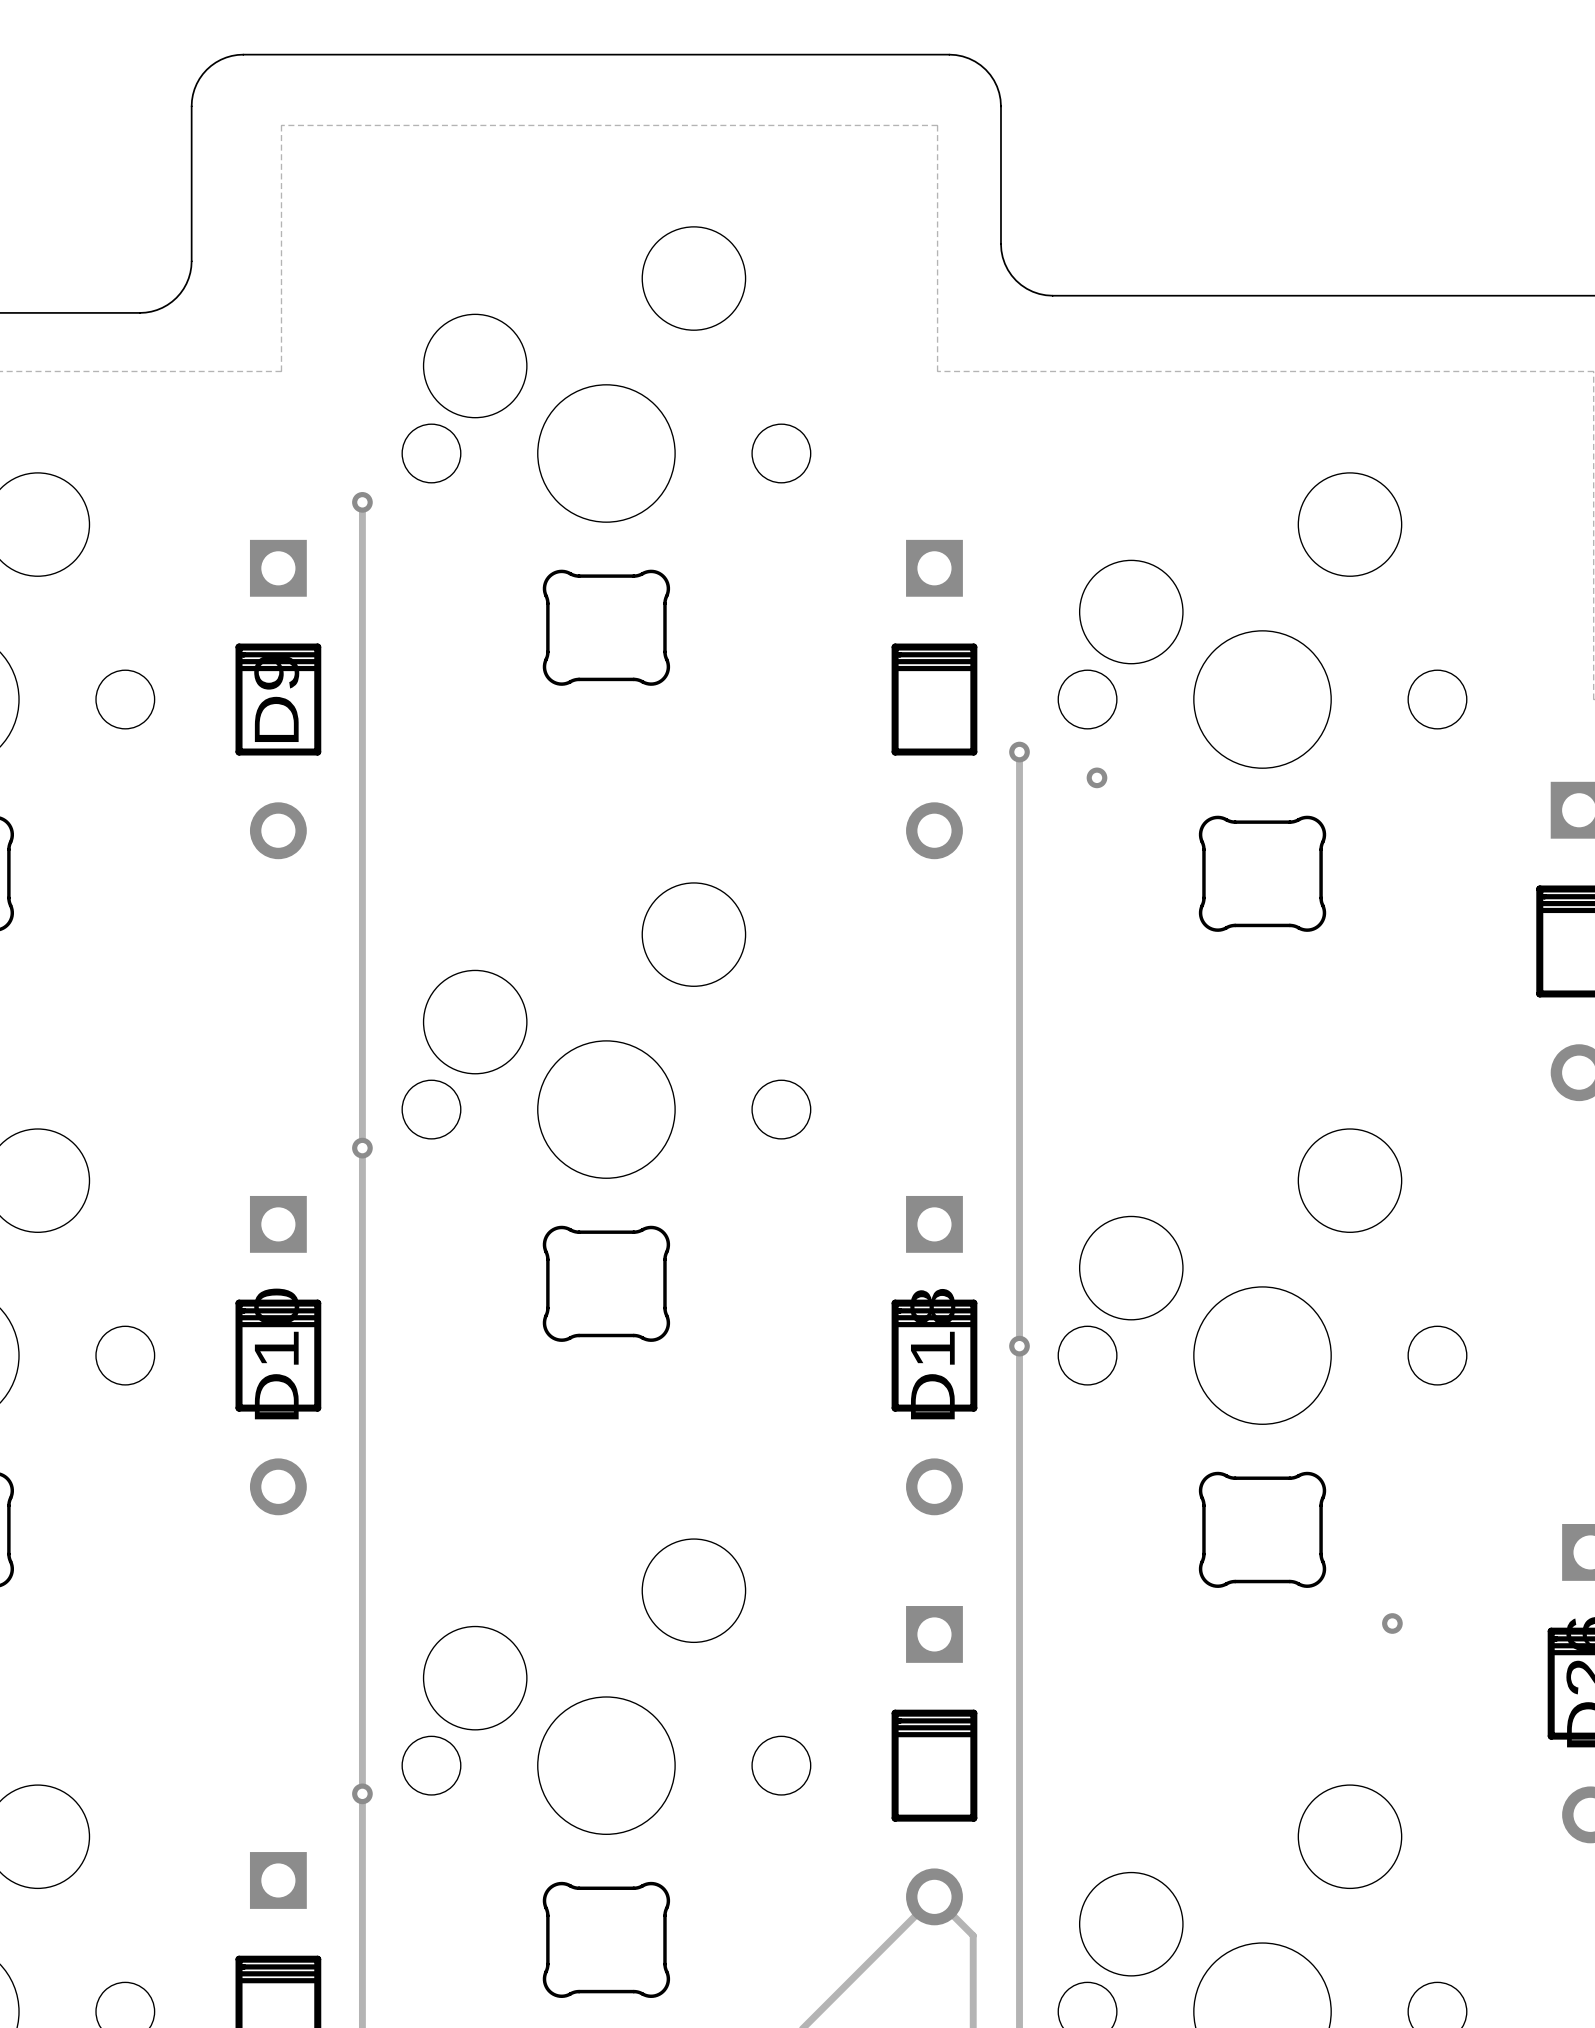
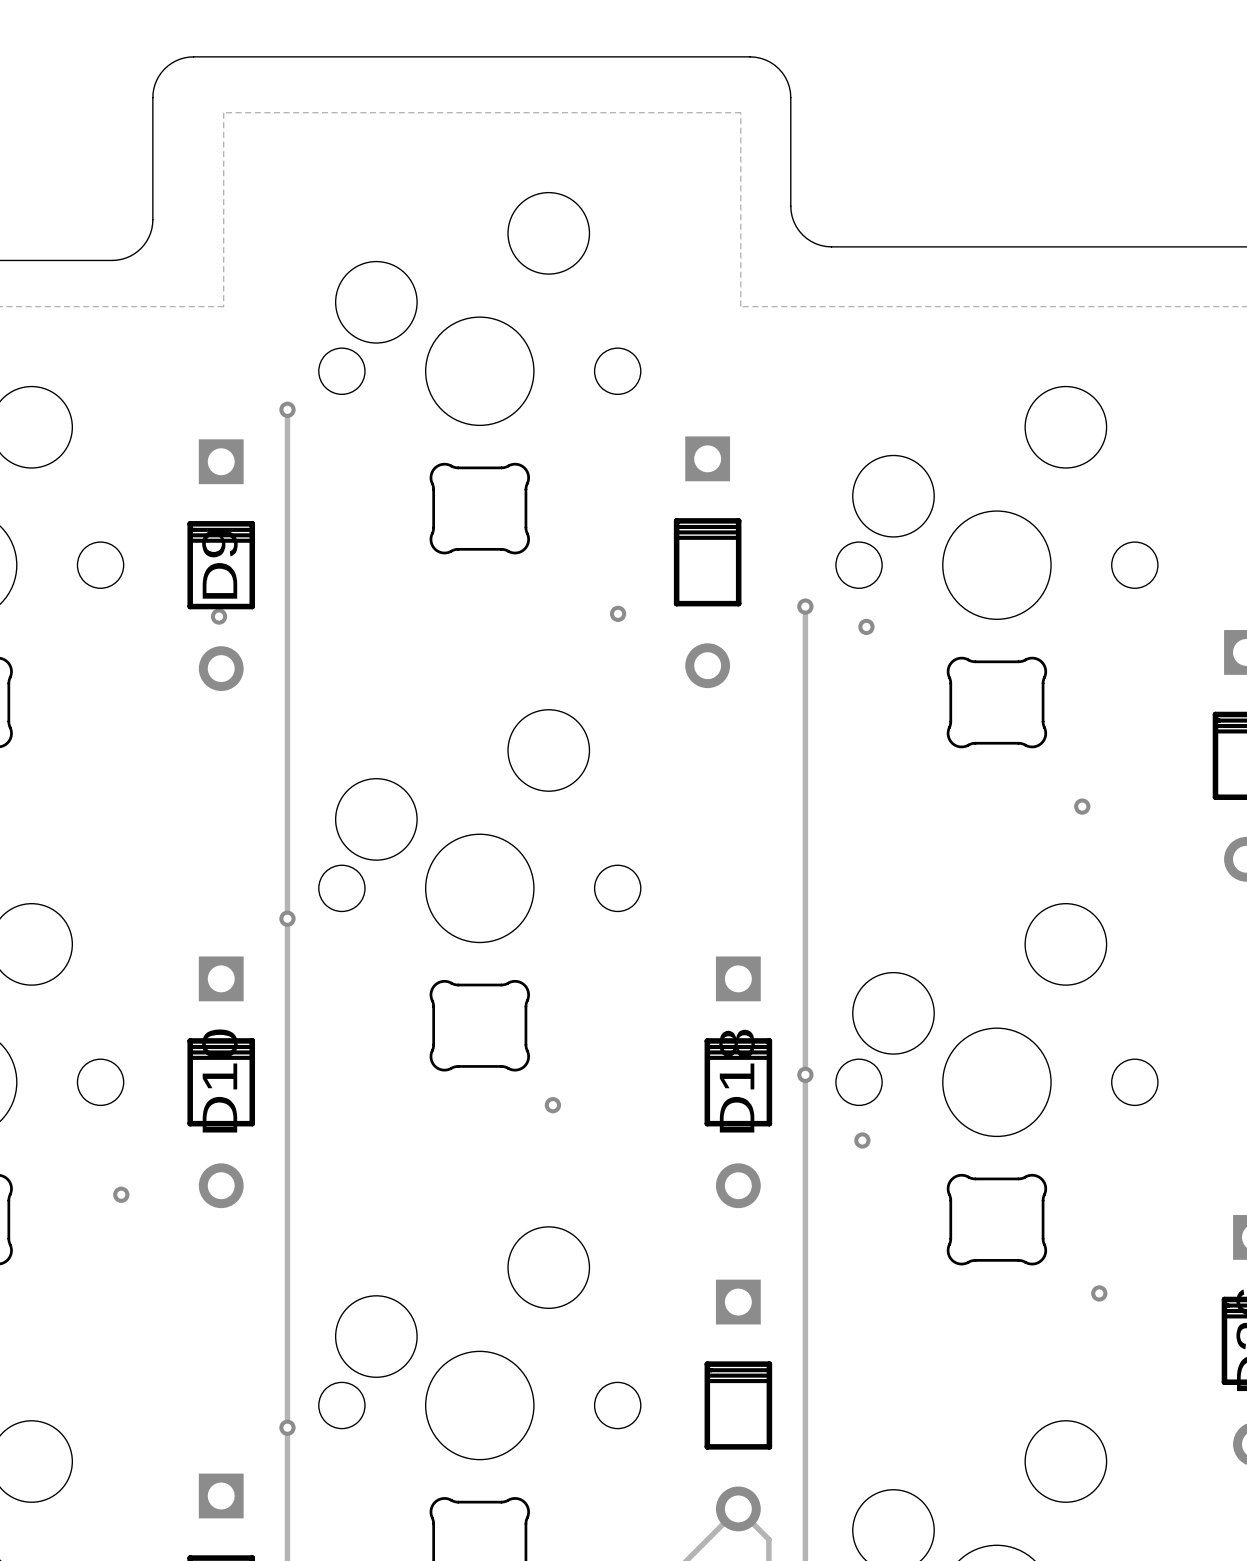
part position: (934, 699) -> (707, 562)
via: none -> (618, 613)
via: none -> (219, 616)
via: none -> (1082, 806)
via: none -> (552, 1105)
via: none -> (862, 1140)
via: none -> (121, 1194)

